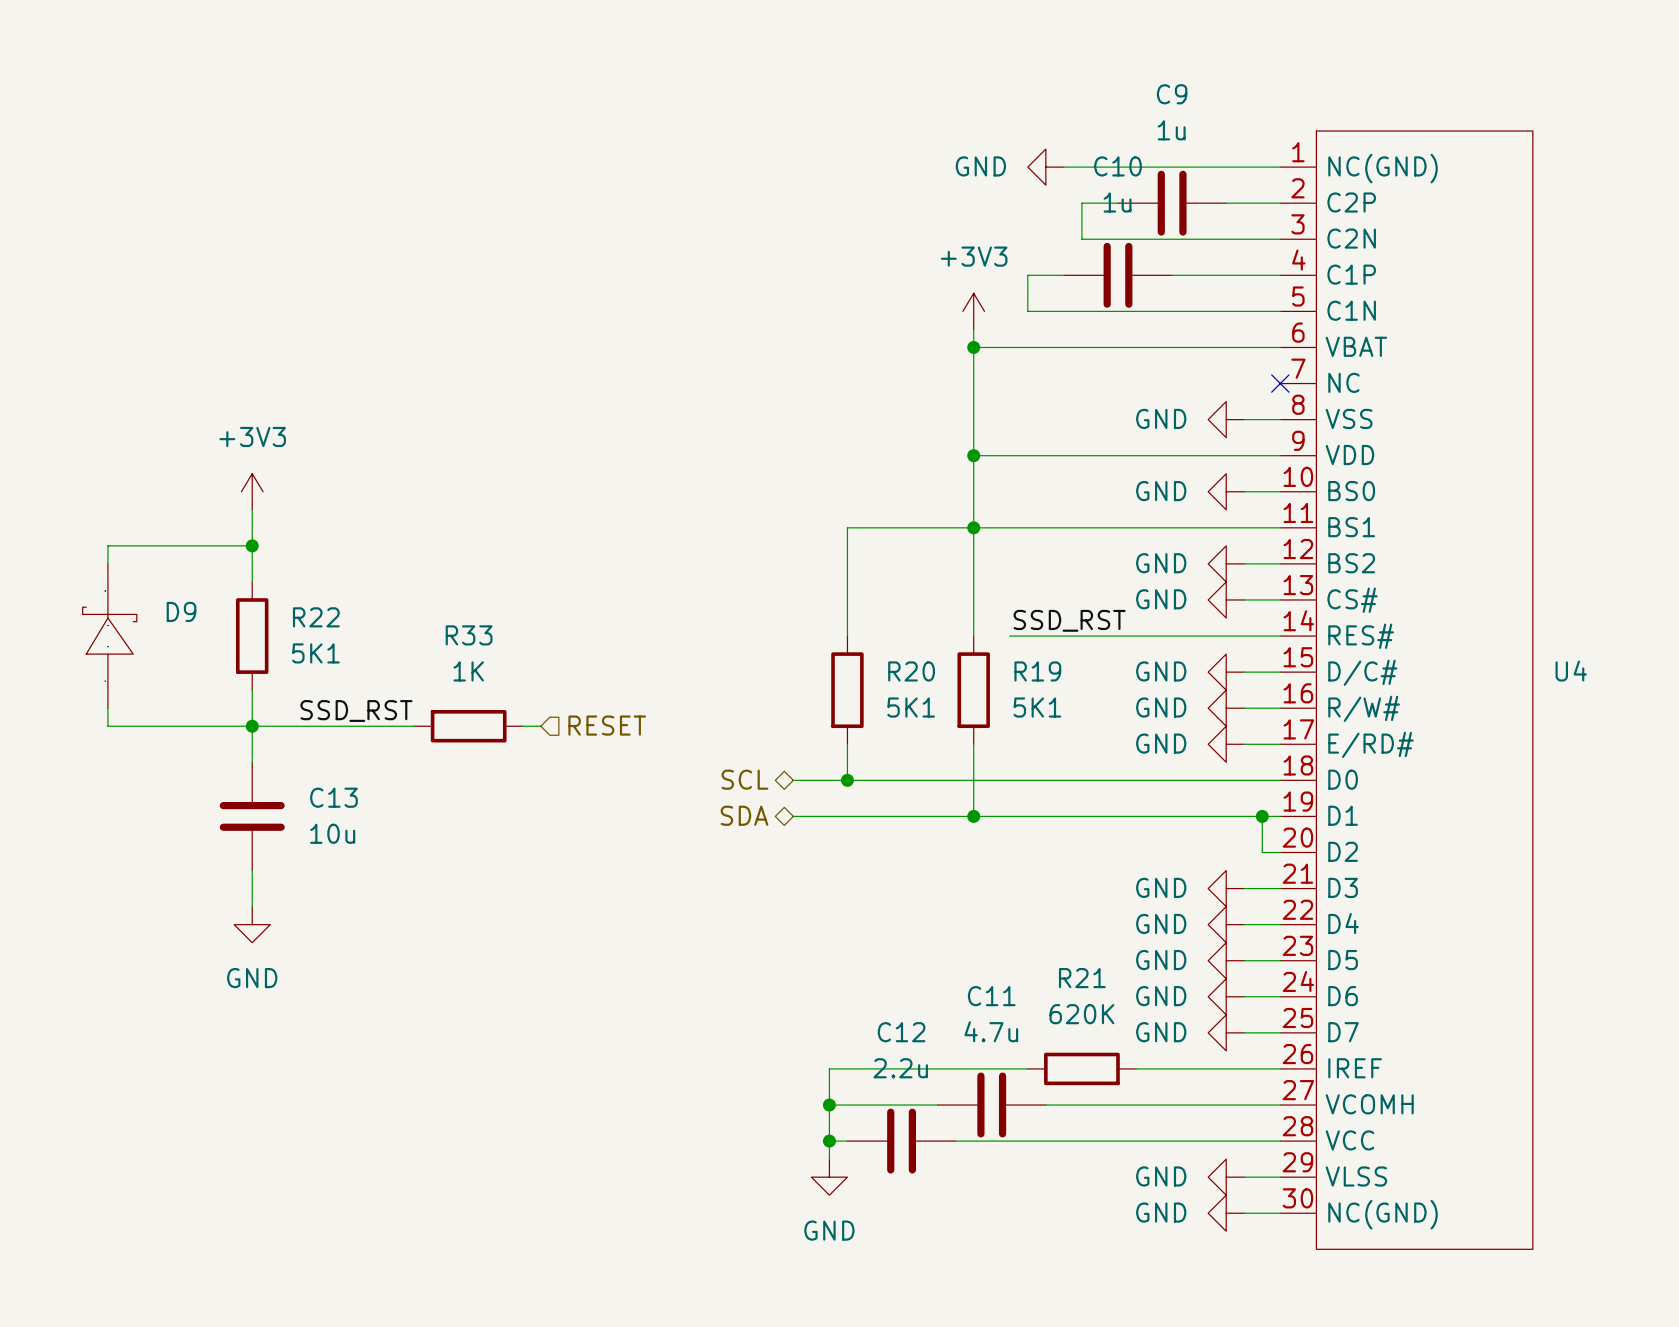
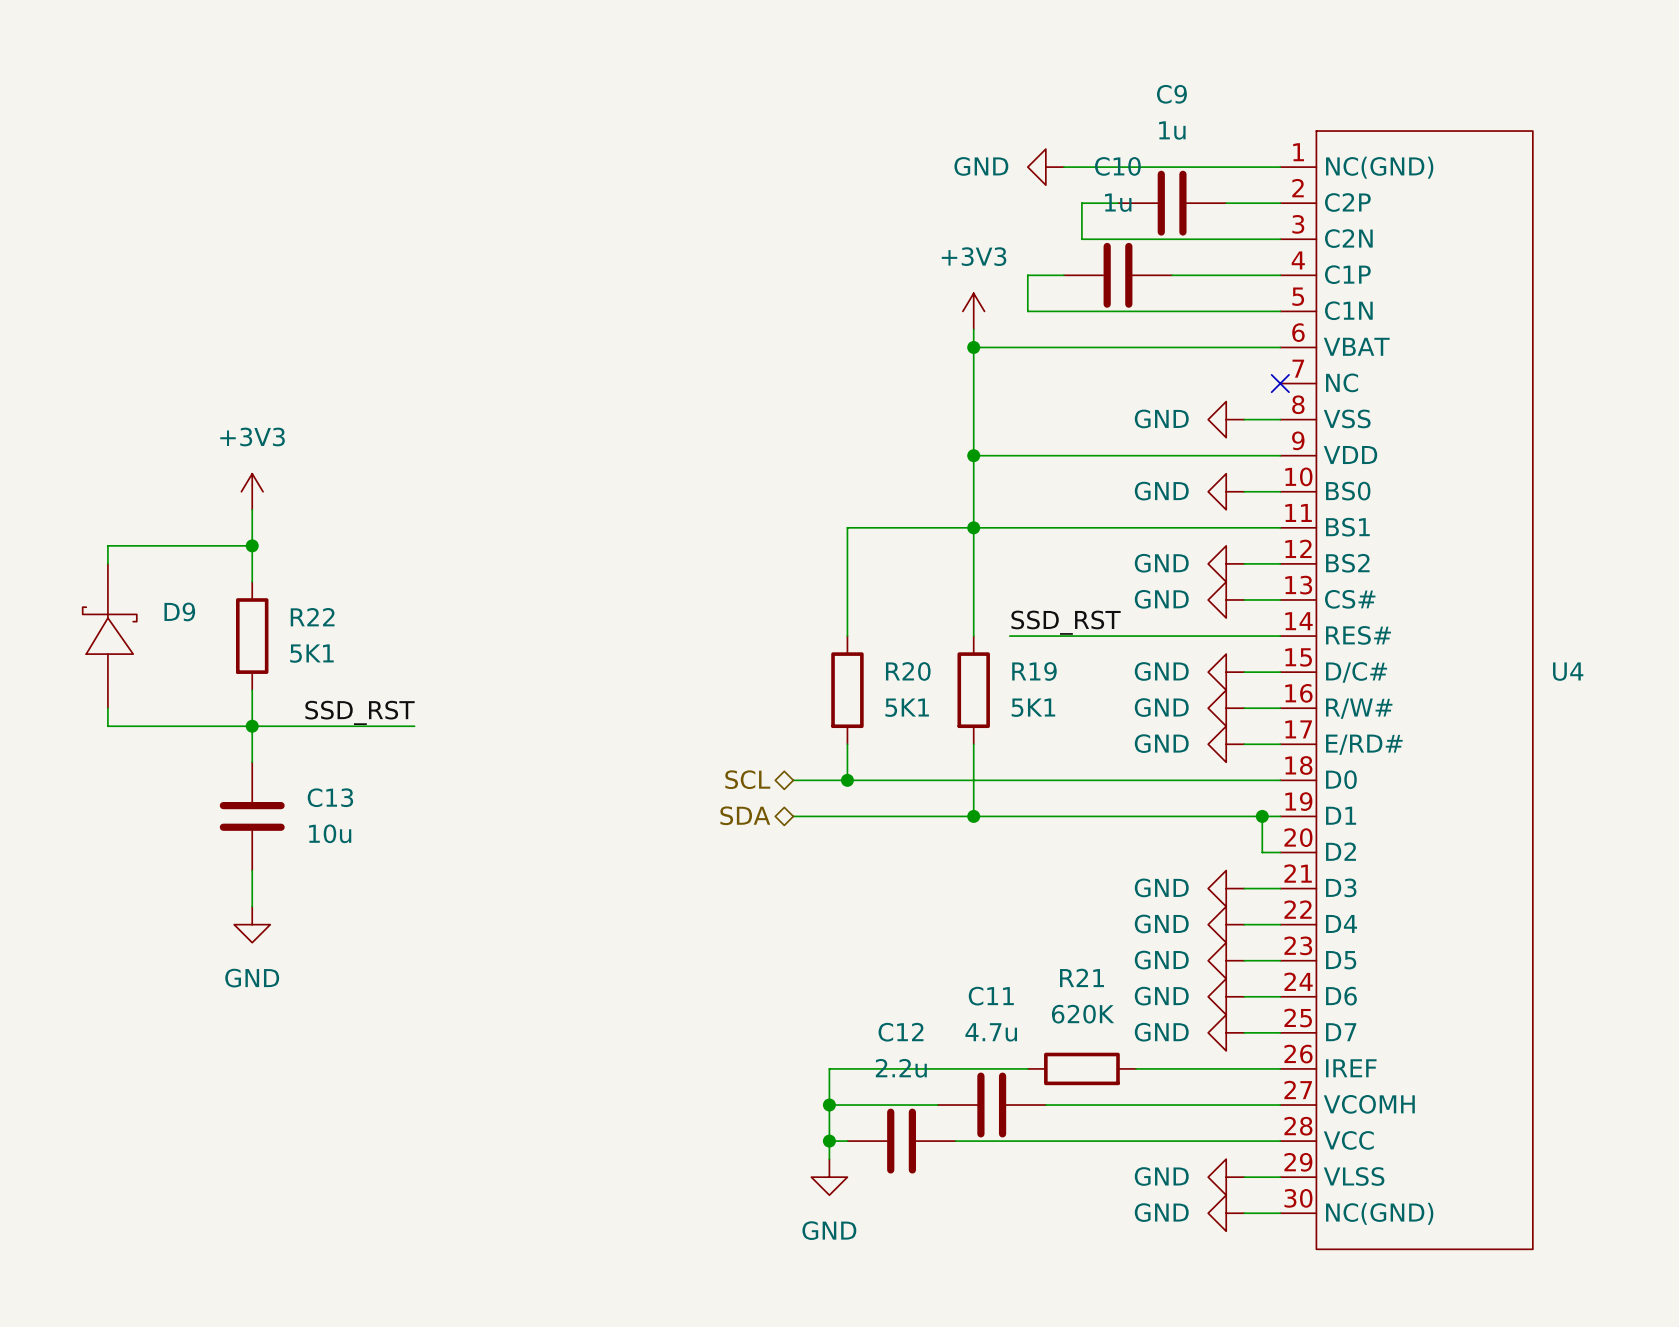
hierarchical label: RESET (607, 725) -> none
R33: 1K (468, 726) -> none
wire: (522, 726) (540, 726) -> none

